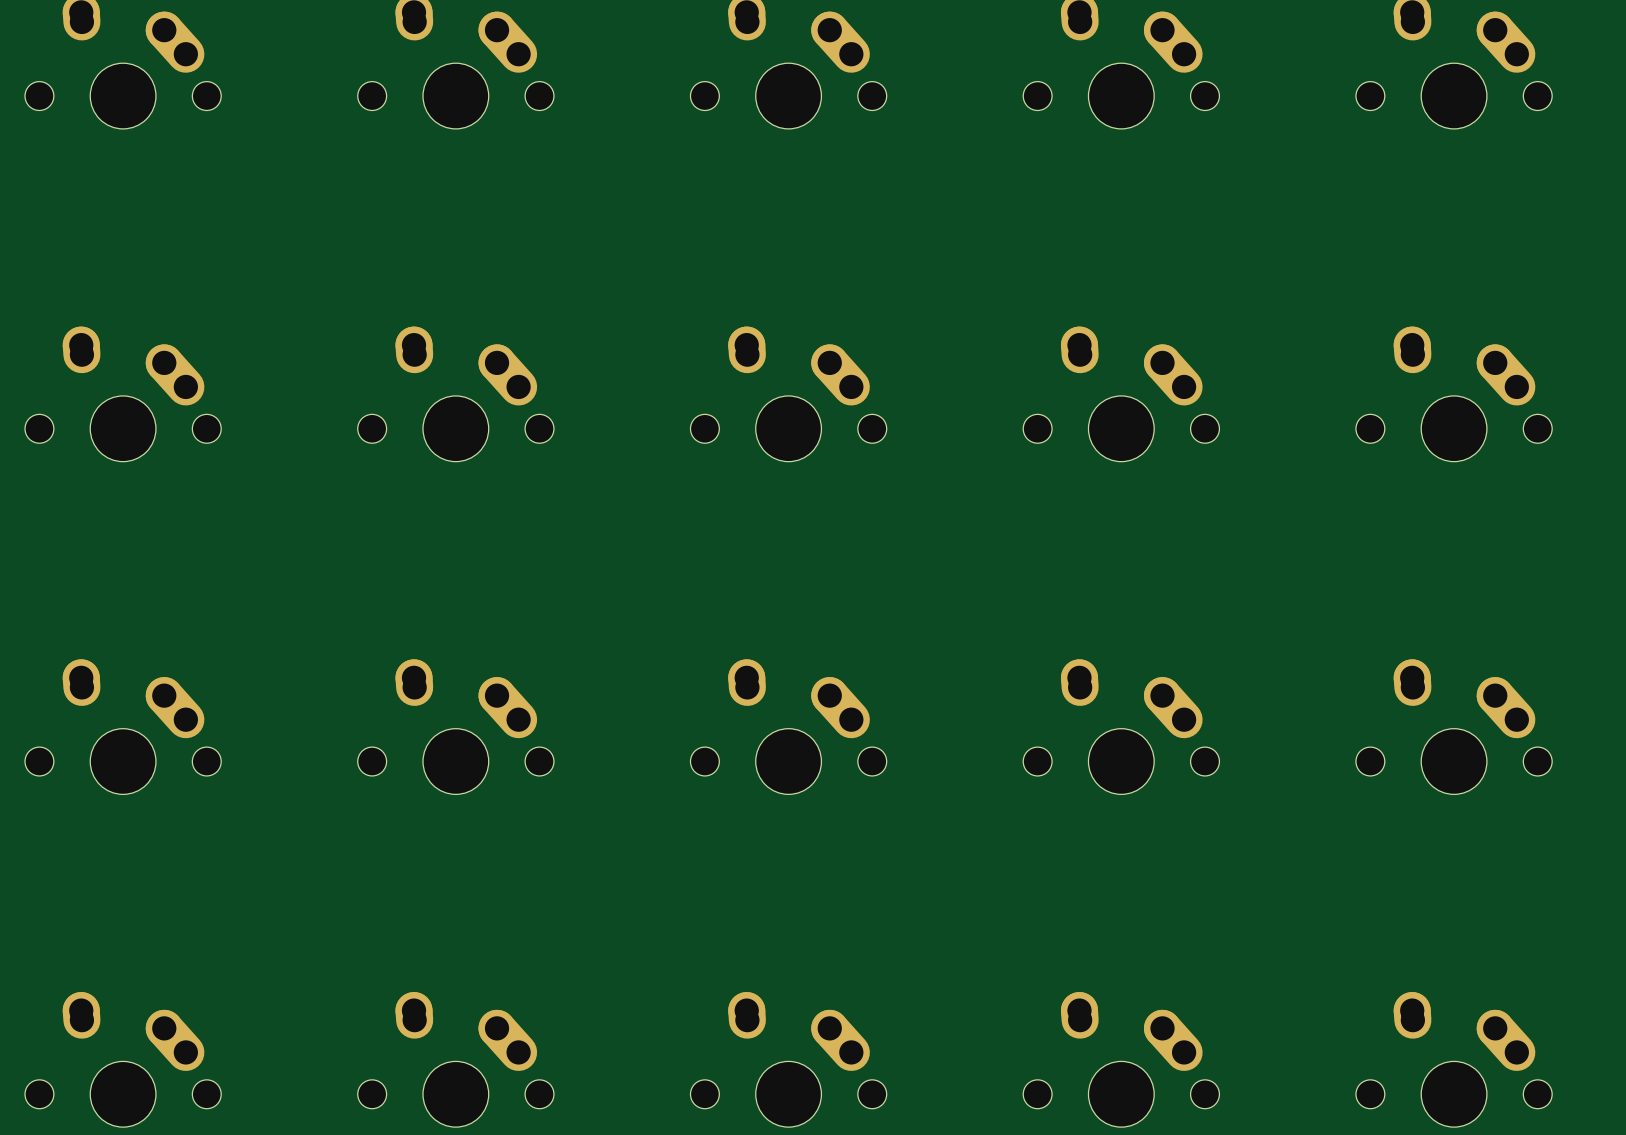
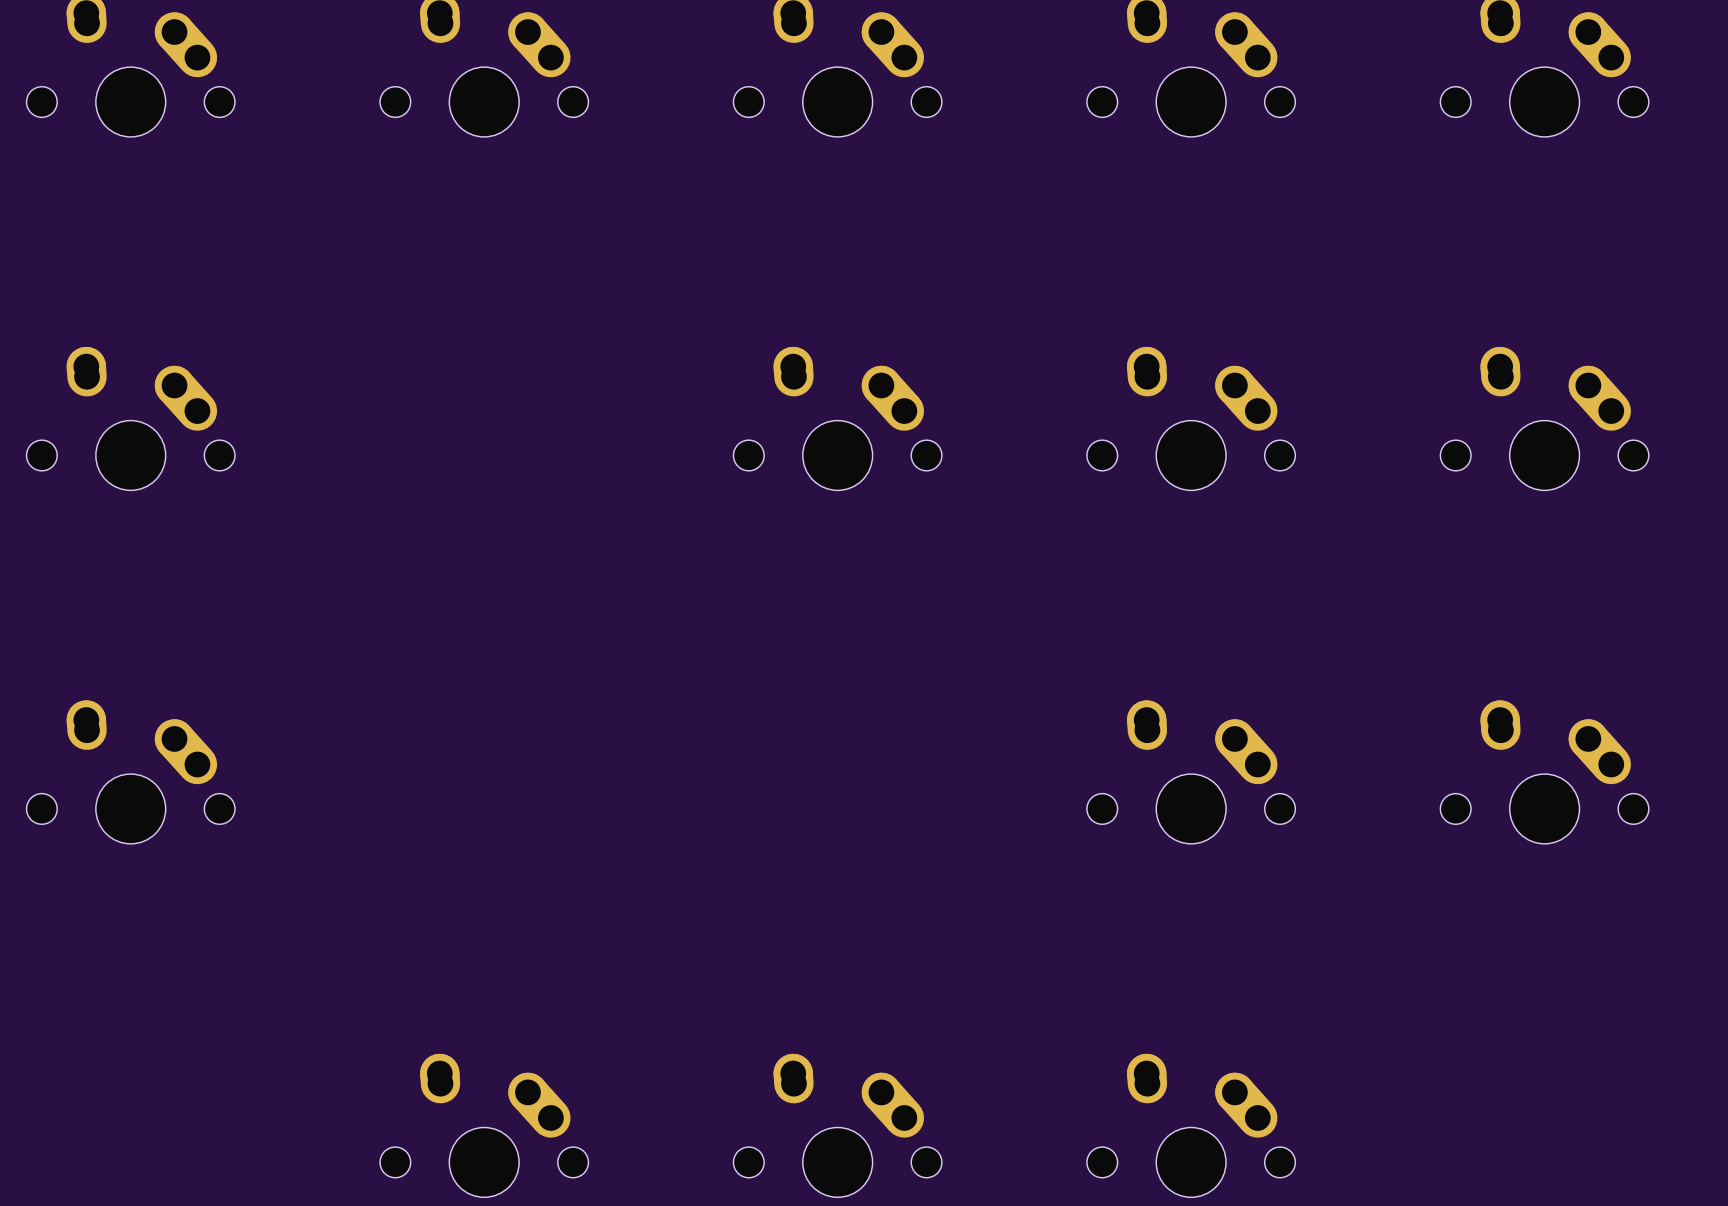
part: (455, 394) -> none
part: (455, 726) -> none
part: (788, 726) -> none
part: (123, 1059) -> none
part: (1454, 1059) -> none

